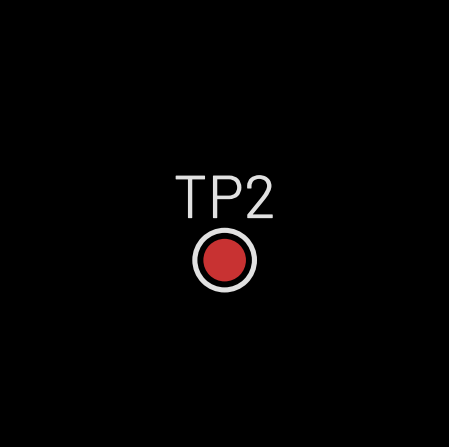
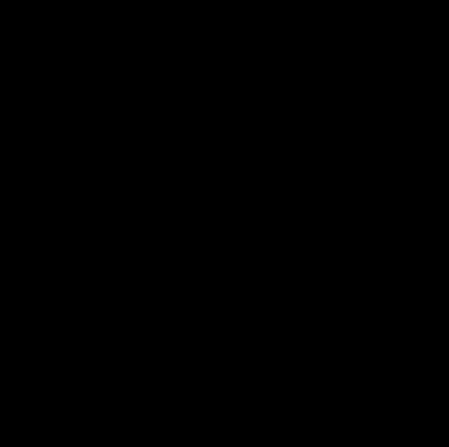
TP2: (224, 260) -> none

